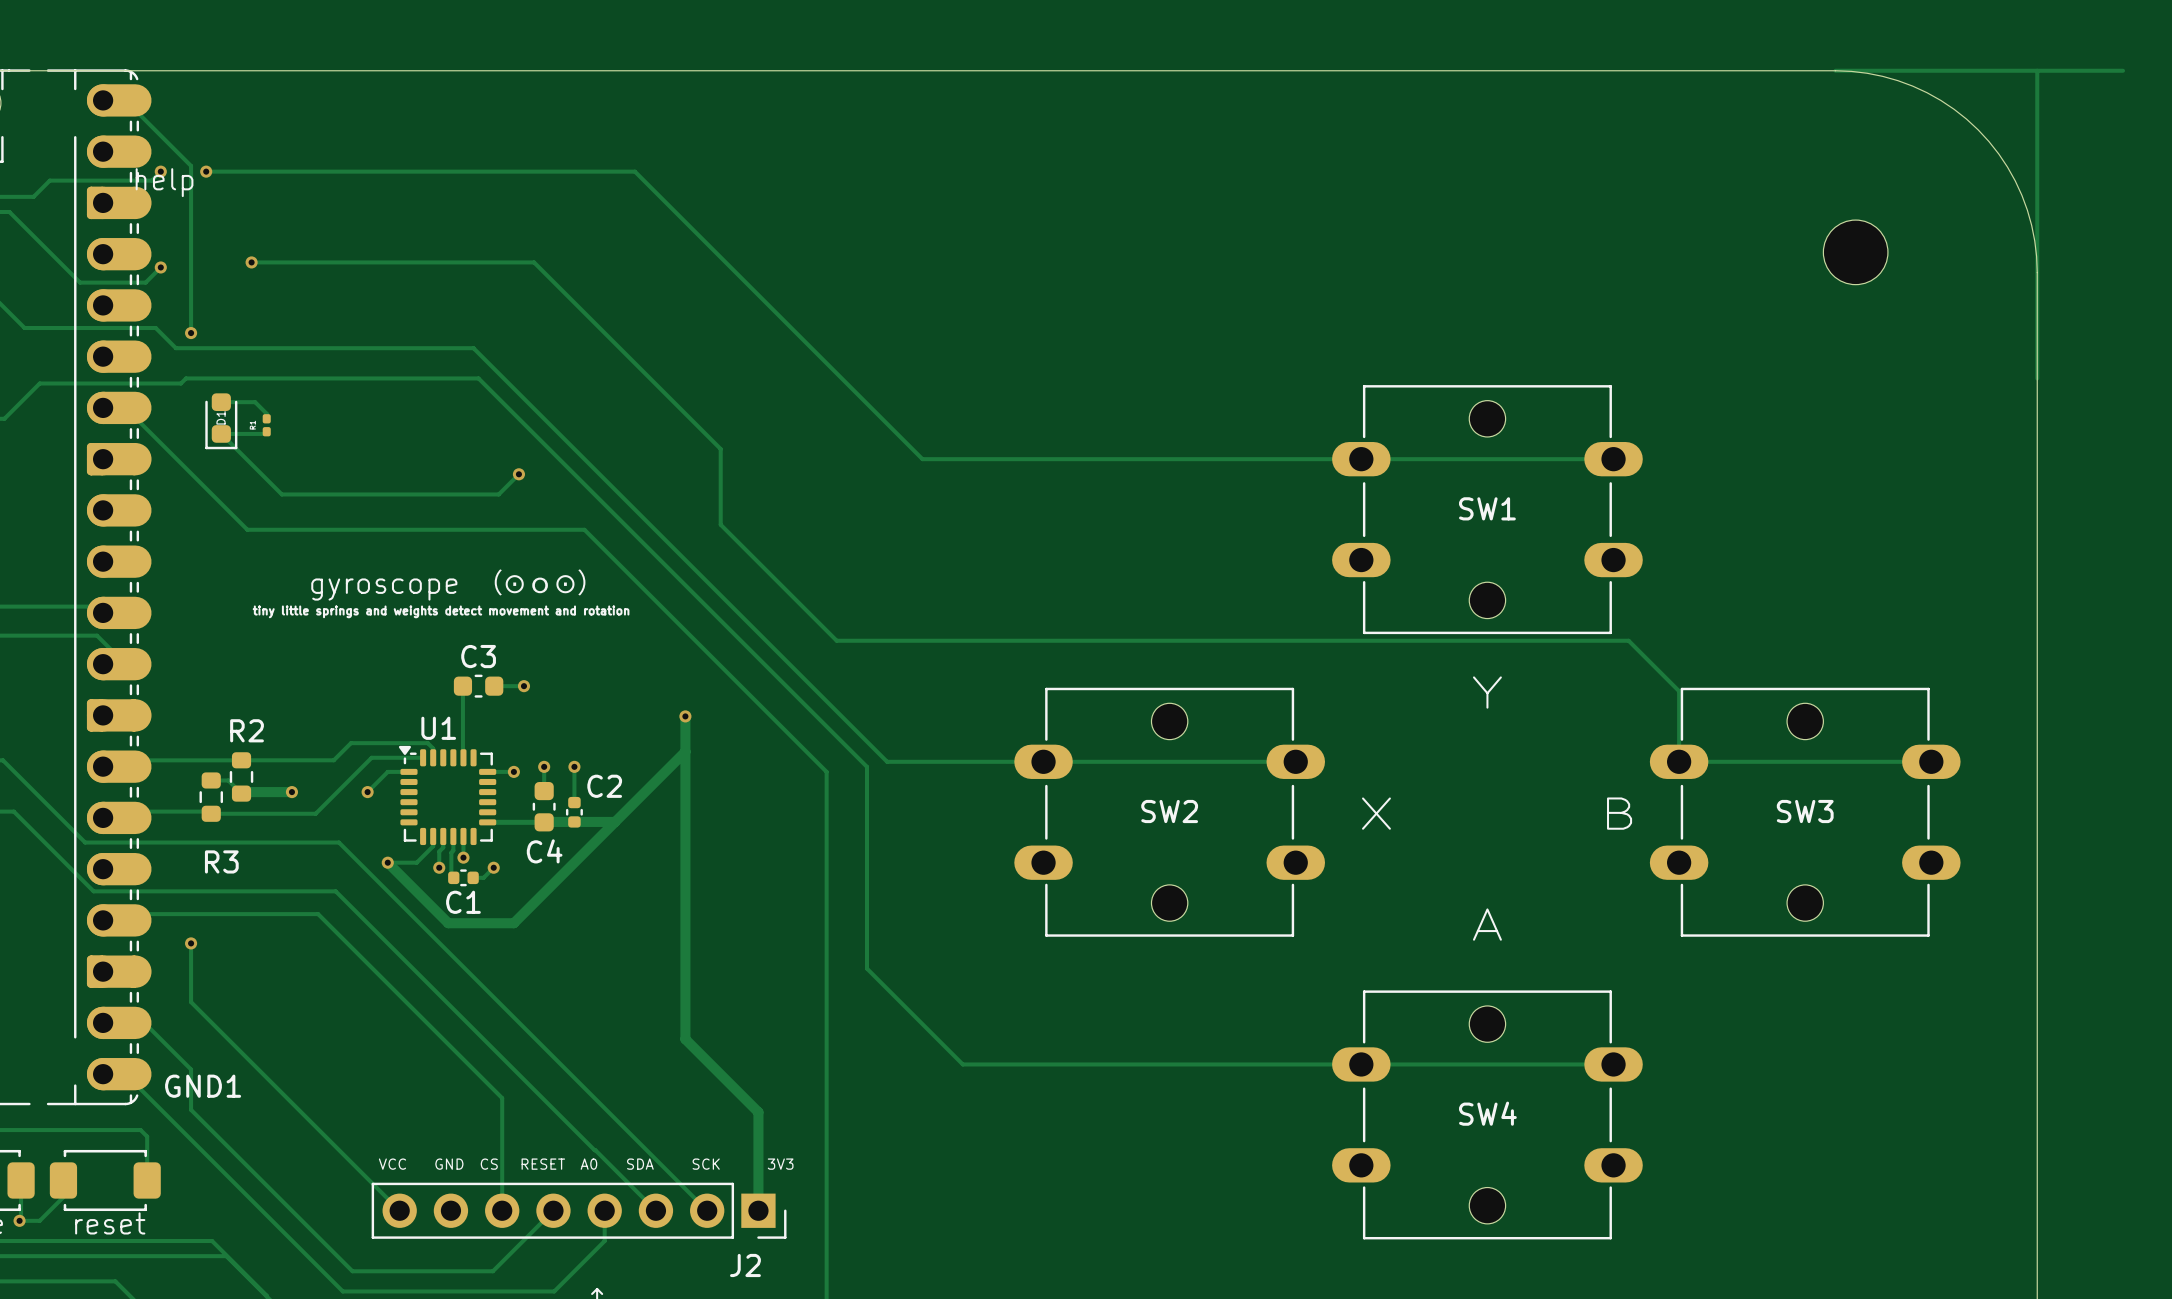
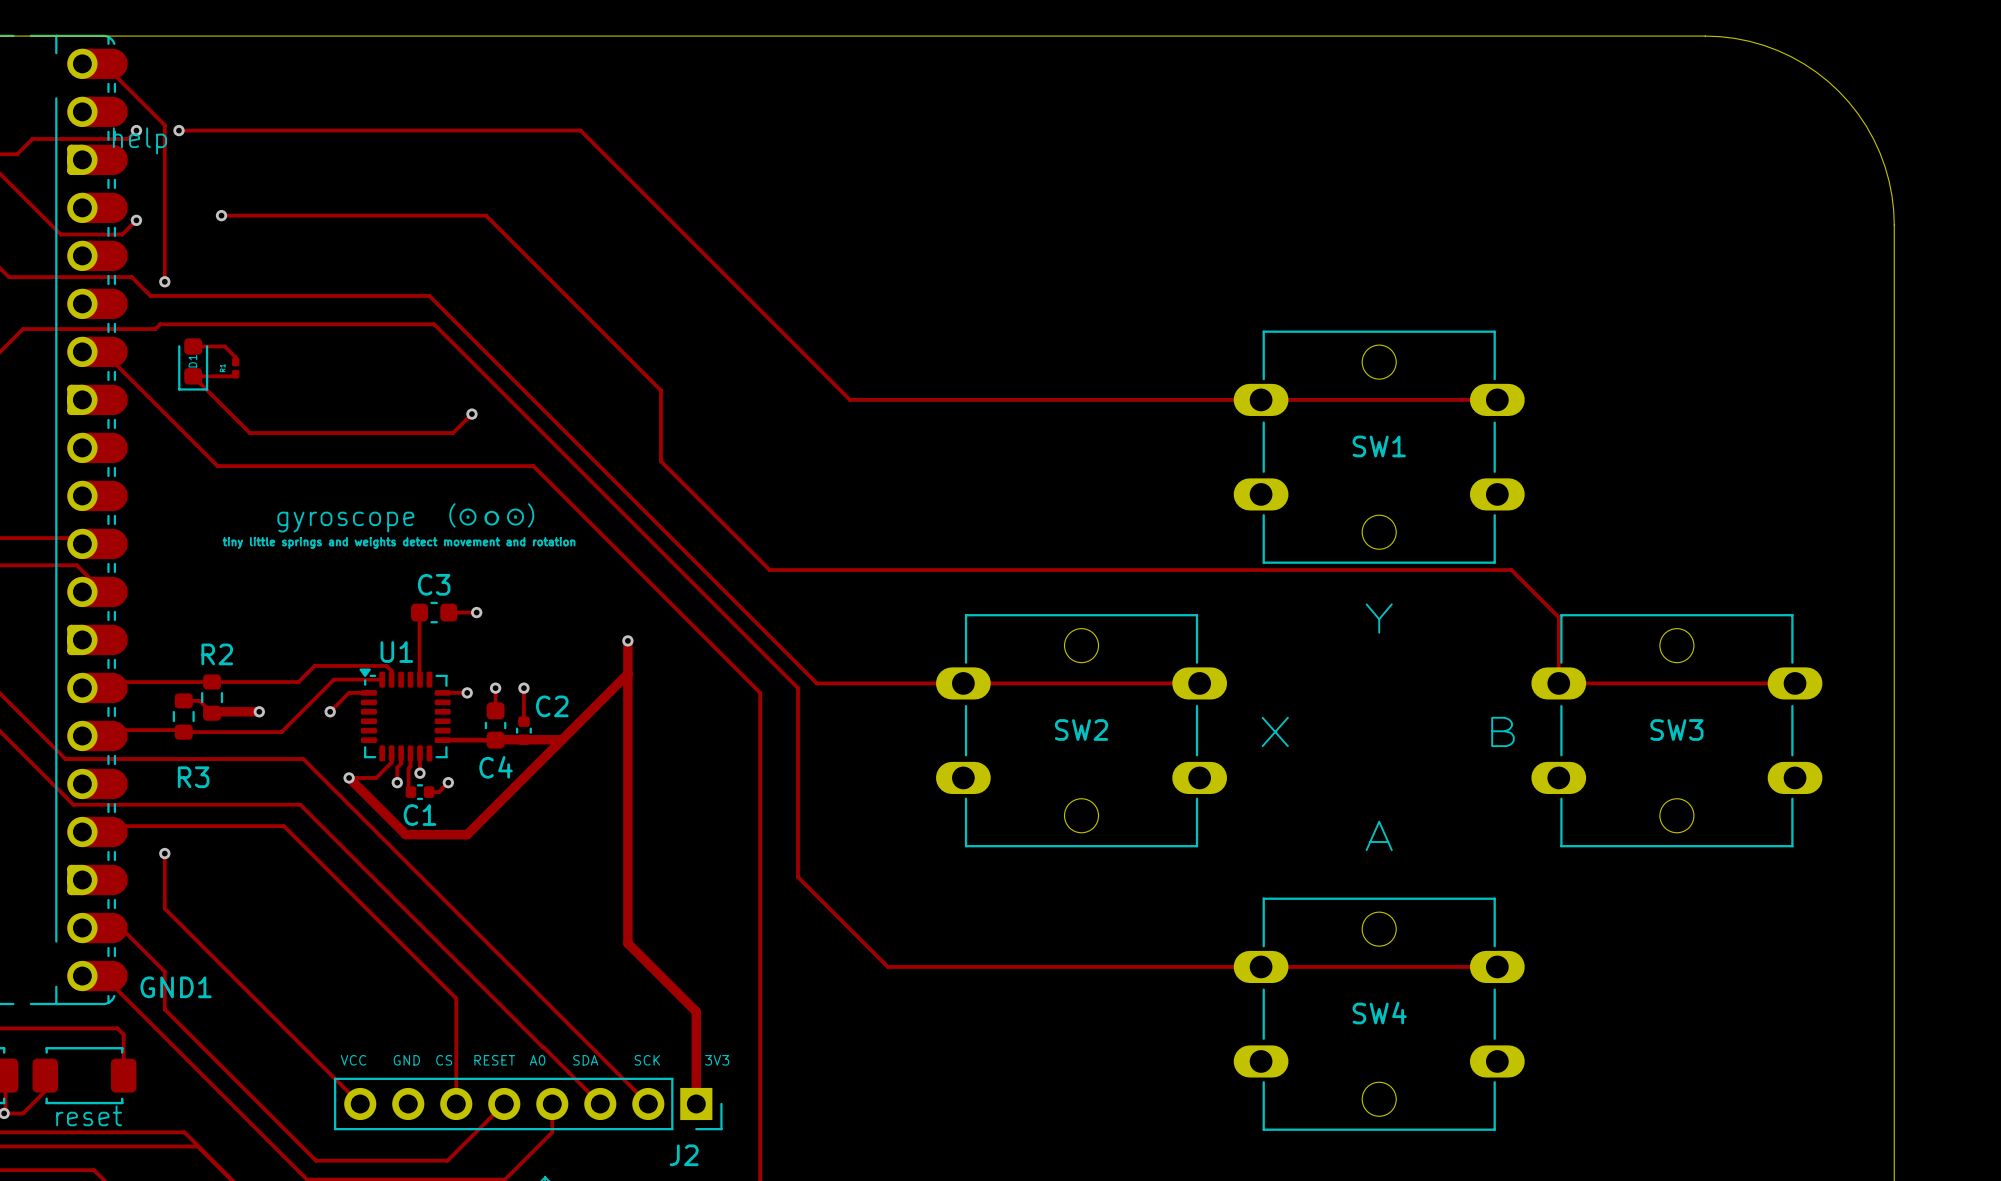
track: (1835, 70) (2123, 70) -> none
track: (2037, 70) (2037, 378) -> none
part: (1855, 252) -> none

